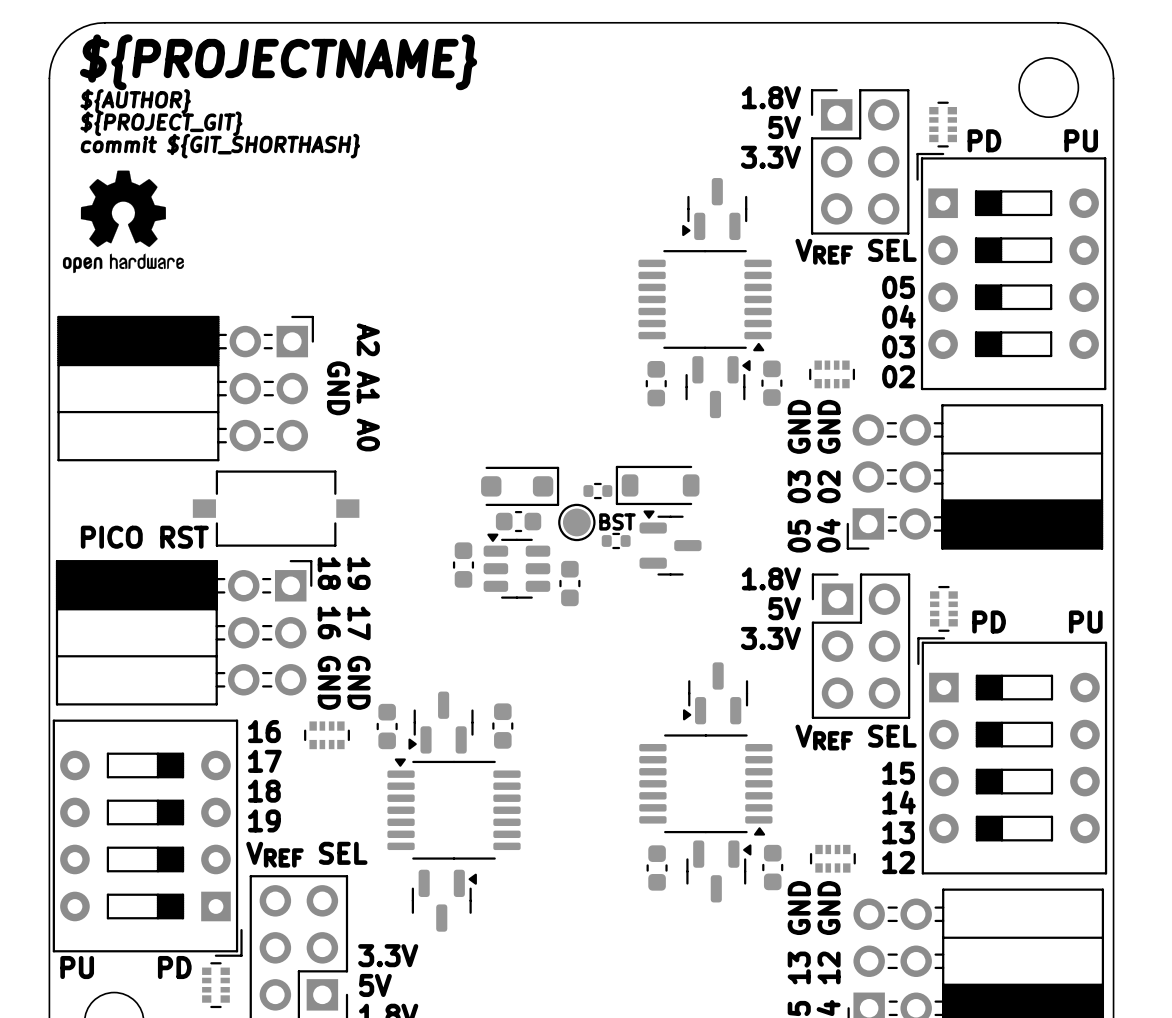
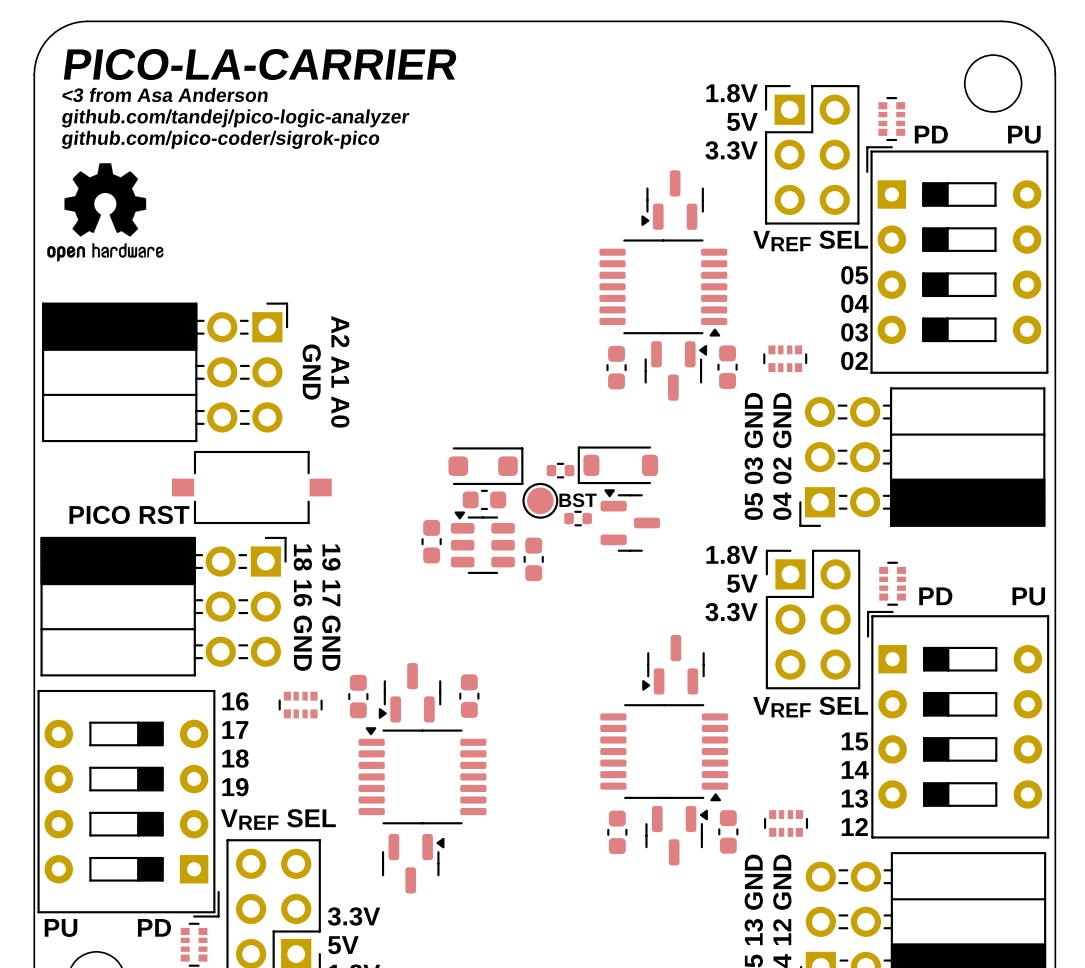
text: ${PROJECTNAME} (278, 62) -> PICO-LA-CARRIER (260, 64)
text: ${AUTHOR} (135, 101) -> <3 from Asa Anderson (165, 95)
text: ${PROJECT_GIT} (161, 123) -> github.com/tandej/pico-logic-analyzer (235, 118)
text: commit ${GIT_SHORTHASH} (220, 146) -> github.com/pico-coder/sigrok-pico (220, 139)

